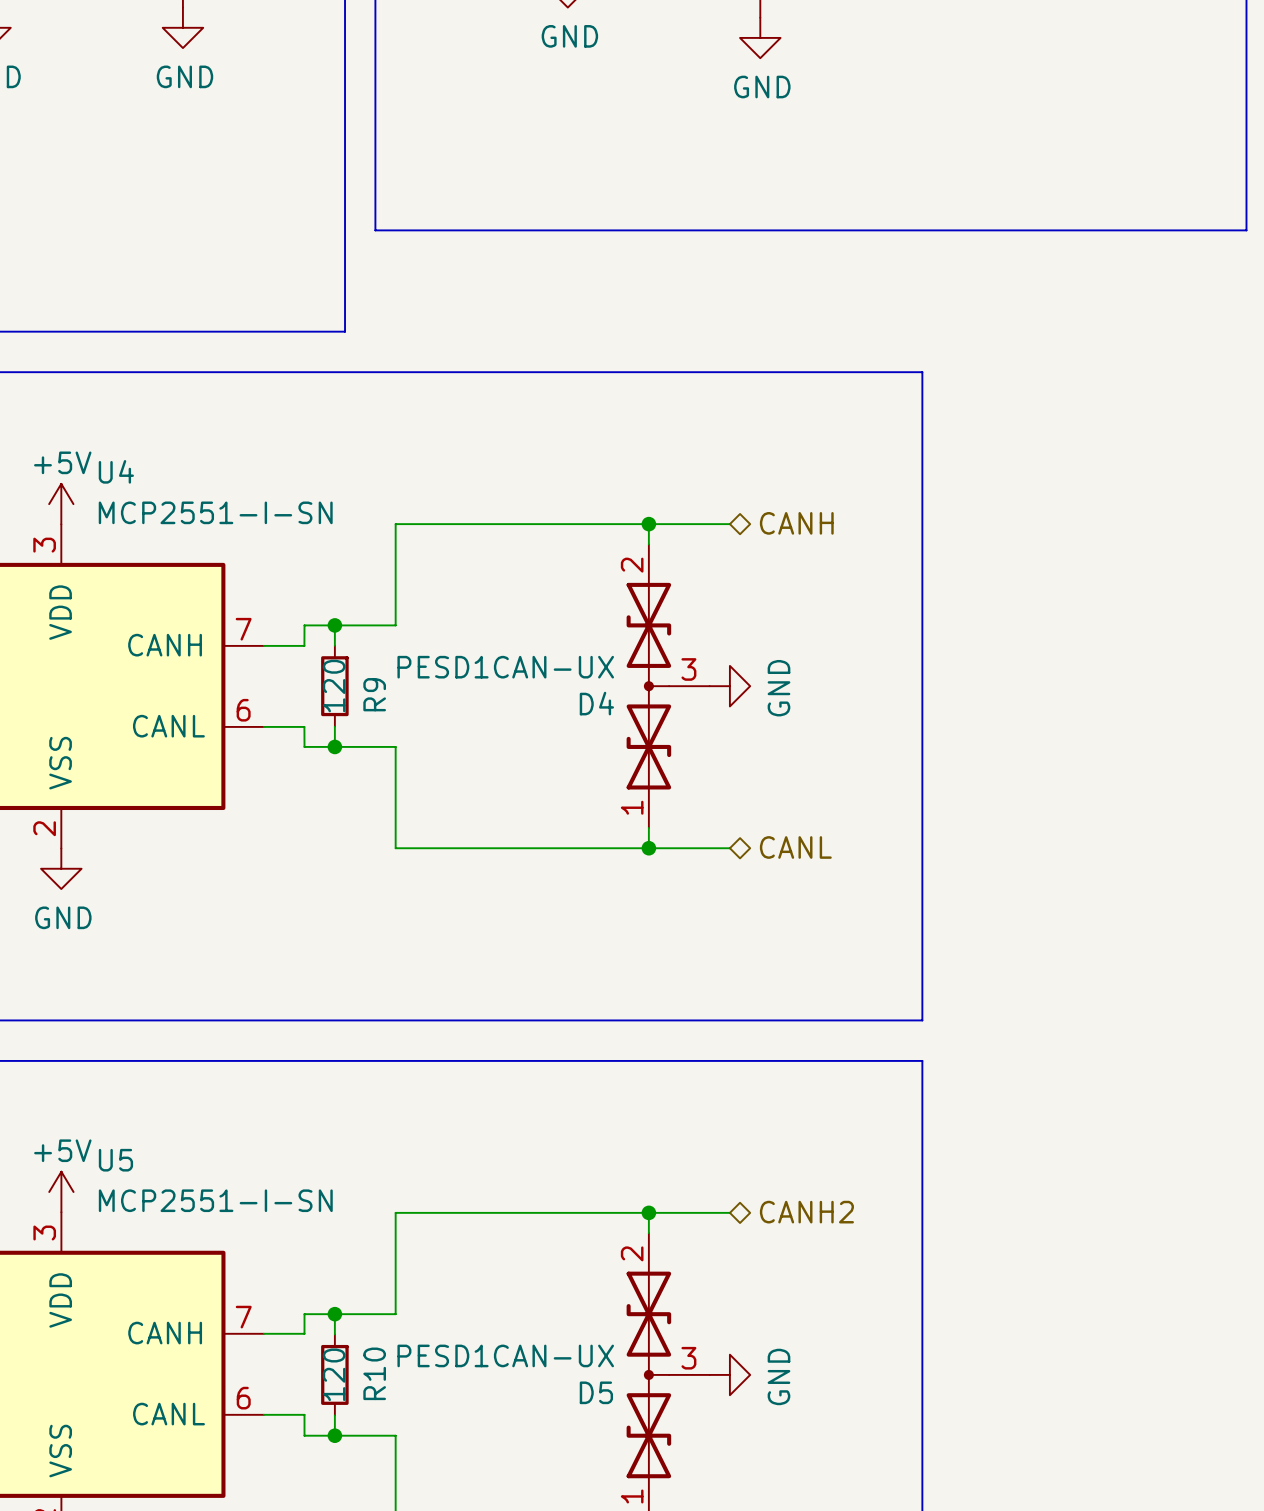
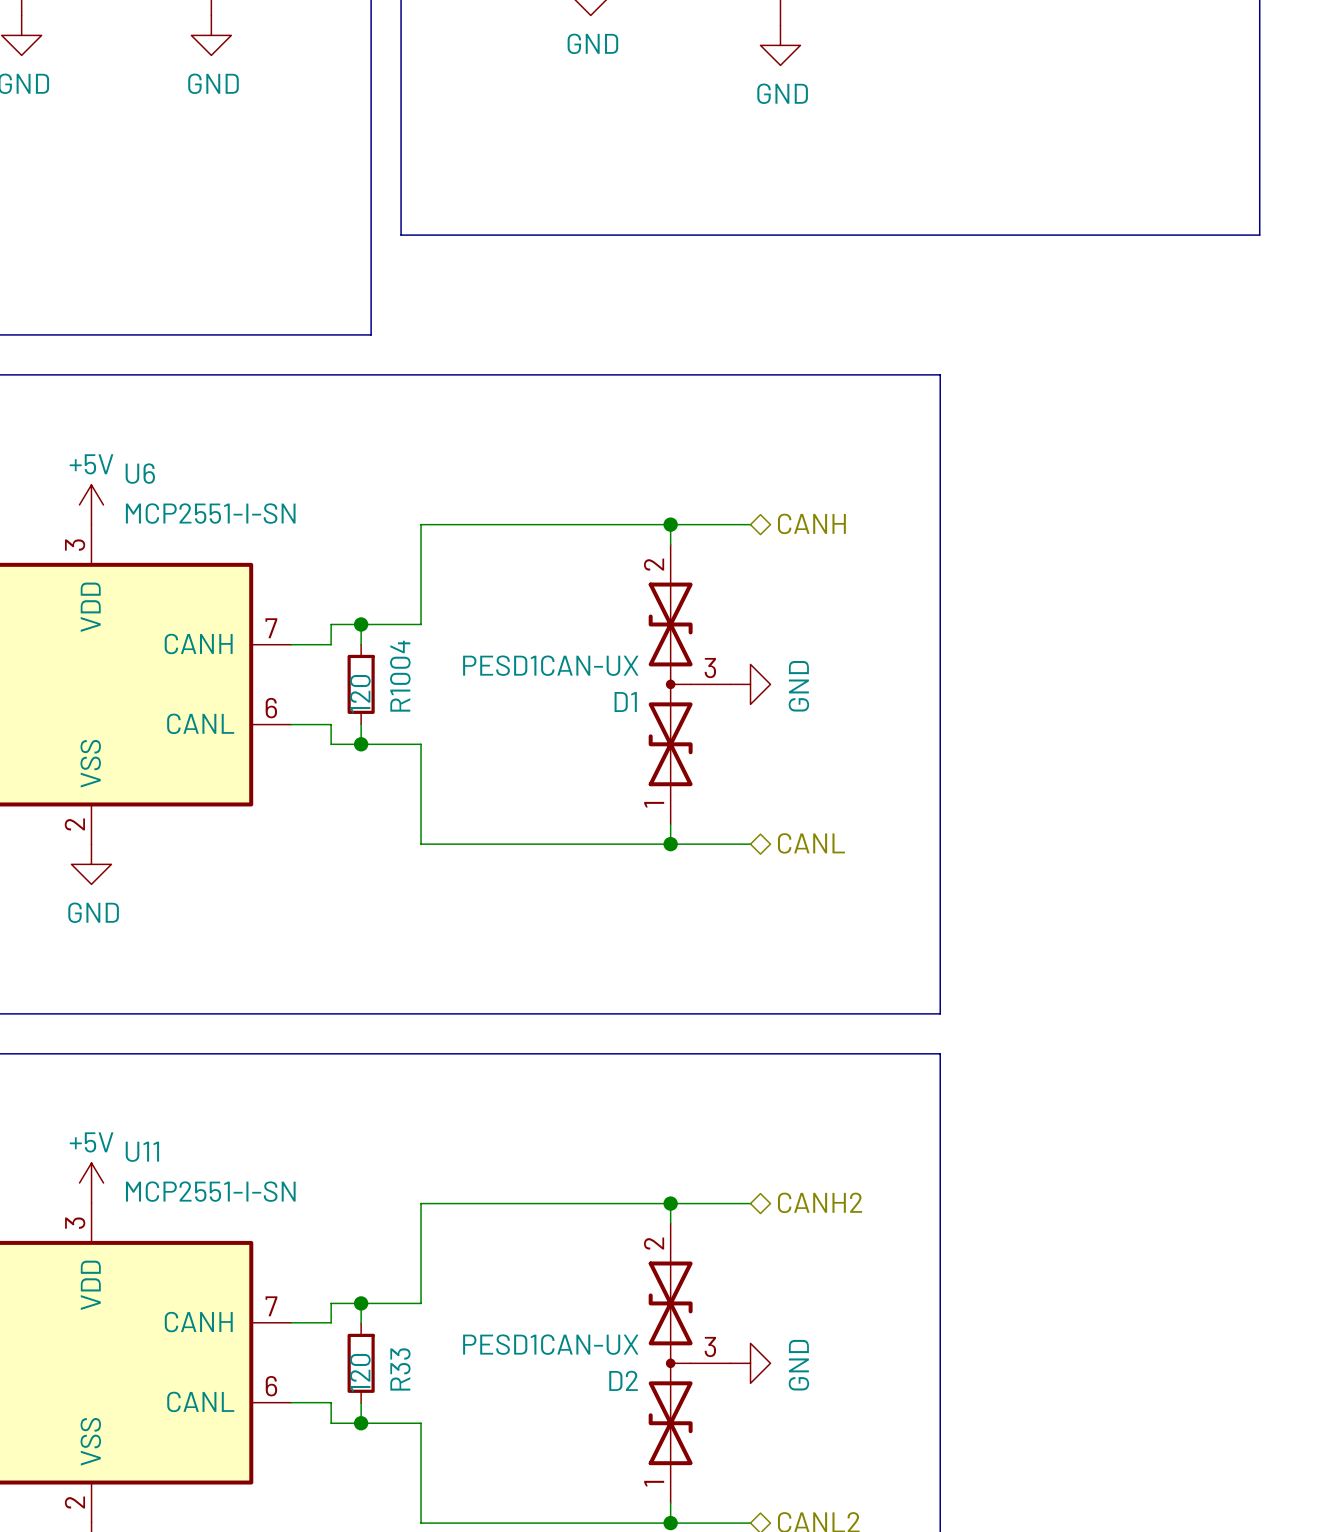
U4 name: U4 (116, 471) -> U6 (140, 473)
R9 name: R9 (374, 694) -> R1004 (400, 676)
D4 name: D4 (596, 703) -> D1 (625, 702)
U5 name: U5 (115, 1160) -> U11 (142, 1151)
R10 name: R10 (374, 1373) -> R33 (400, 1369)
D5 name: D5 (596, 1392) -> D2 (623, 1380)

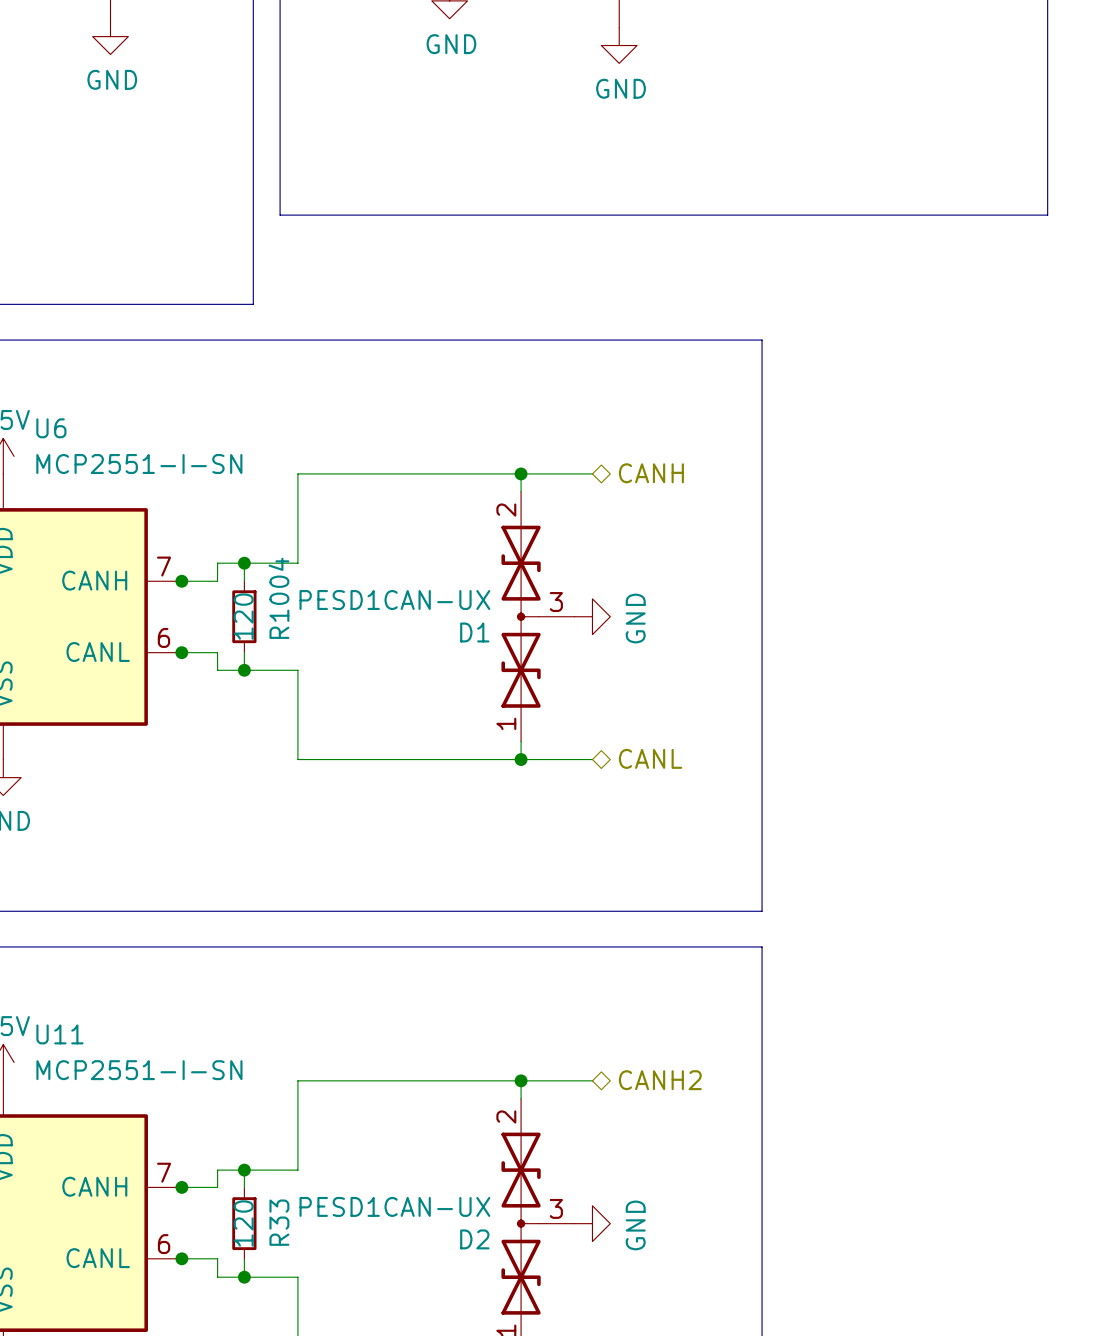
junction: none -> (181, 581)
junction: none -> (181, 652)
junction: none -> (181, 1187)
junction: none -> (181, 1258)

